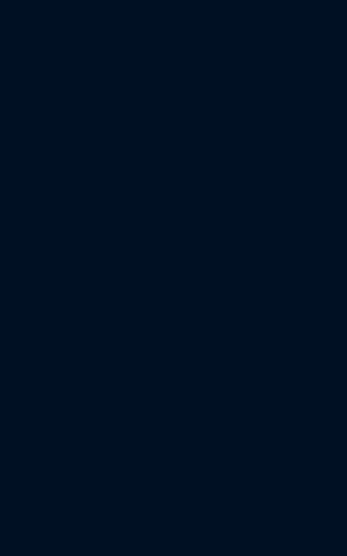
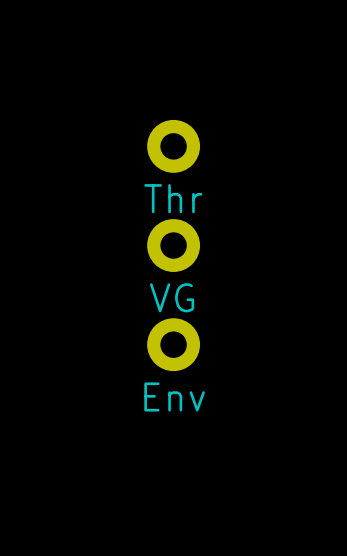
part: none -> Thr (173, 146)
part: none -> VG (173, 245)
part: none -> Env (173, 344)

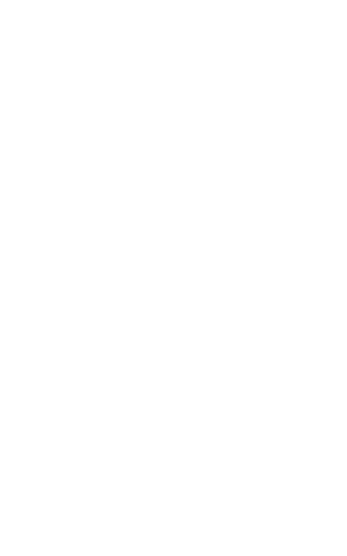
part: Thr (173, 146) -> none
part: VG (173, 245) -> none
part: Env (173, 344) -> none

